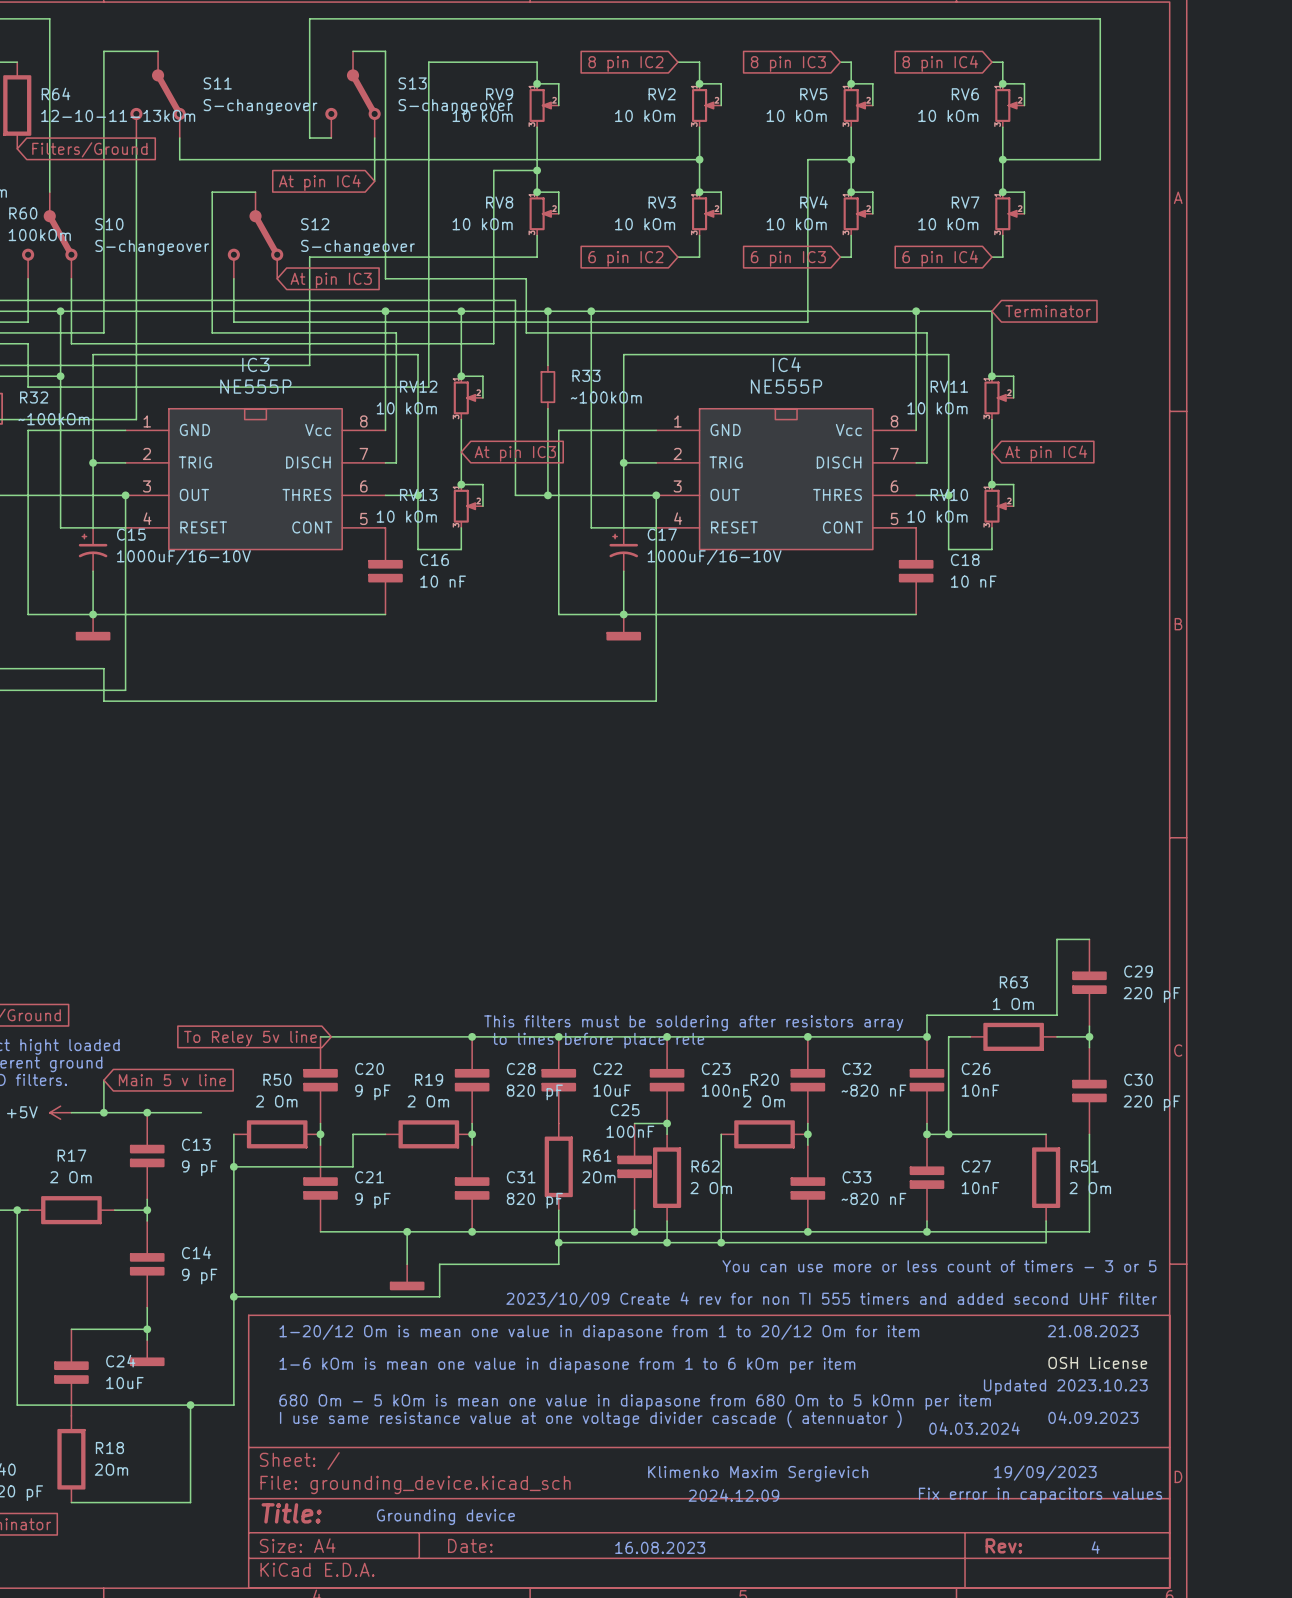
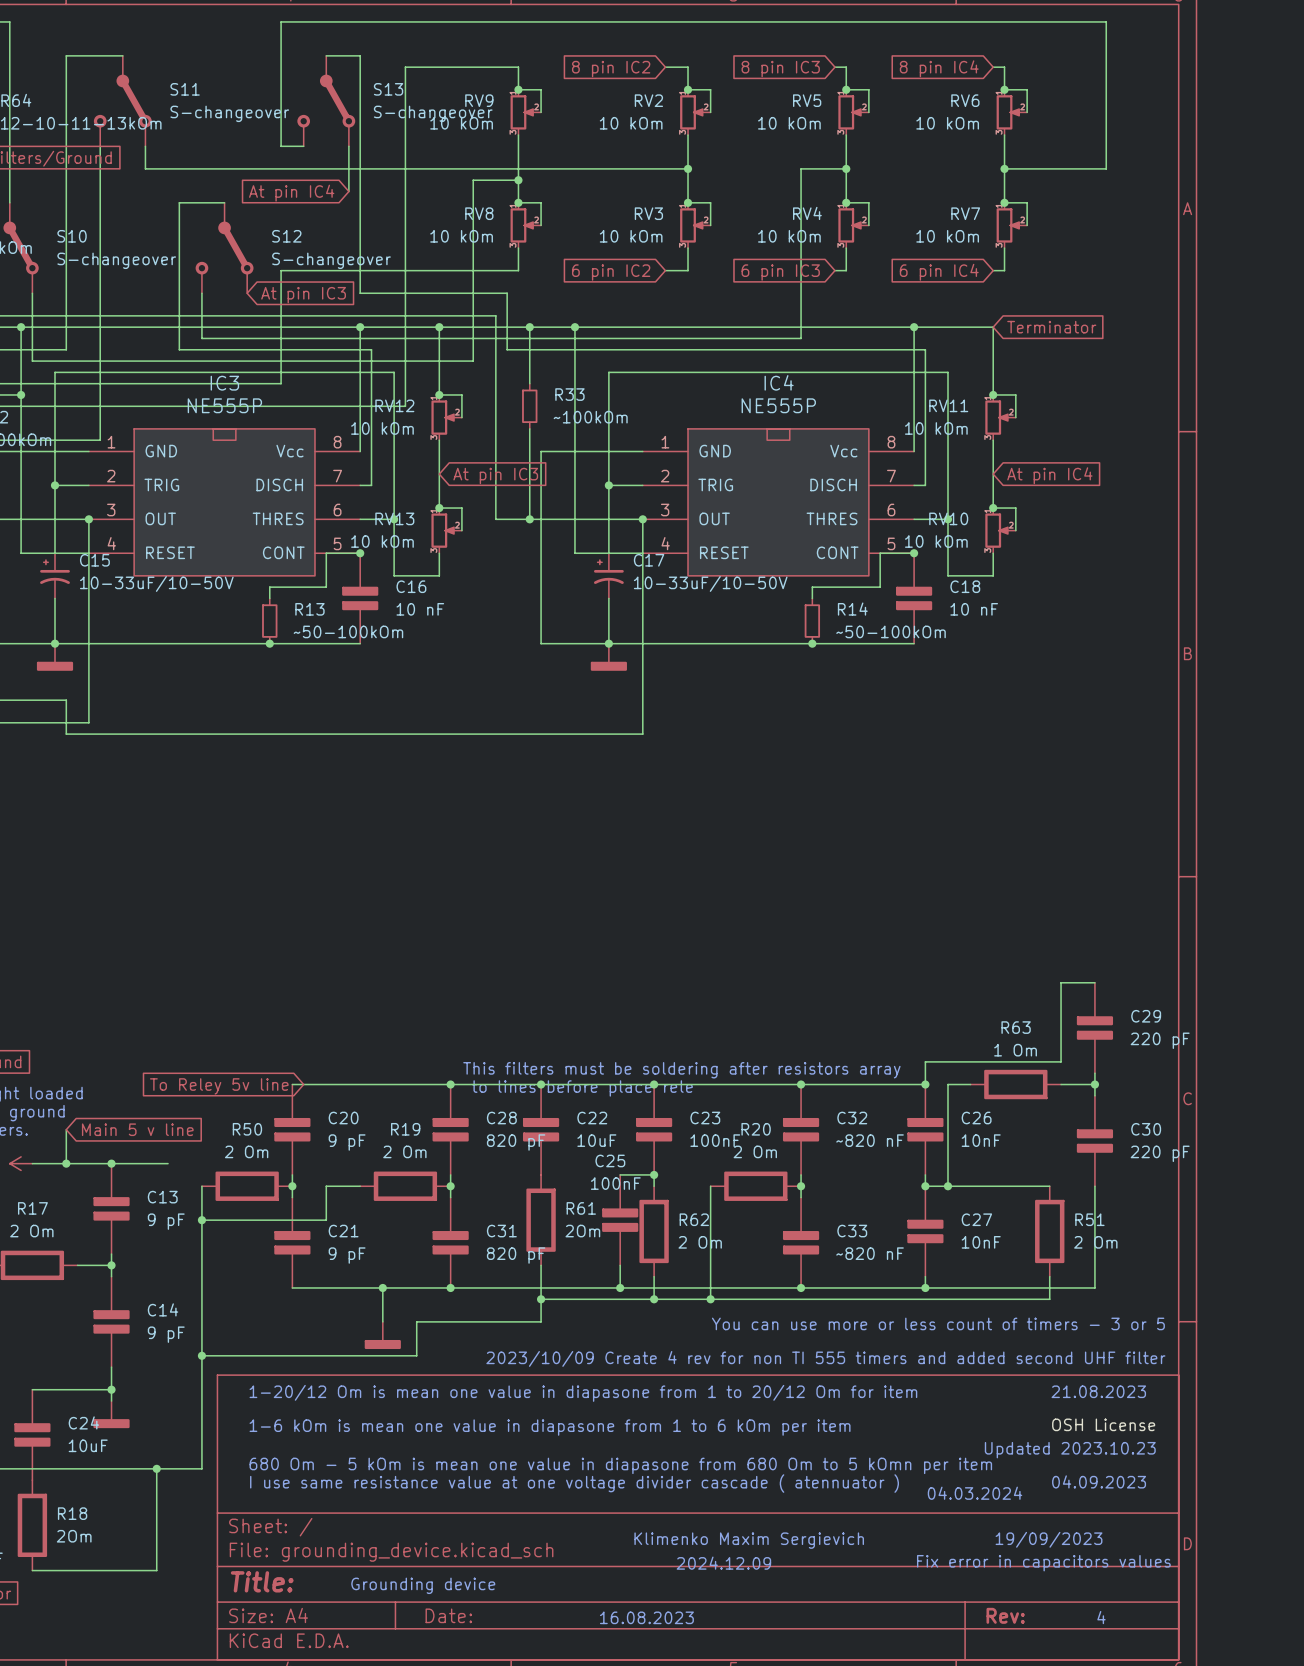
wire: none -> (360, 553) (326, 553) (326, 587) (269, 587) (269, 598)
junction: none -> (360, 553)
wire: none -> (914, 553) (880, 553) (880, 587) (812, 587) (812, 598)
junction: none -> (914, 553)
C15 text: 1000uF/16-10V (183, 557) -> 10-33uF/10-50V (156, 583)
C17 text: 1000uF/16-10V (714, 557) -> 10-33uF/10-50V (710, 583)
R13: none -> ~50-100kOm (269, 621)
R14: none -> ~50-100kOm (812, 621)
junction: none -> (269, 643)
junction: none -> (812, 643)

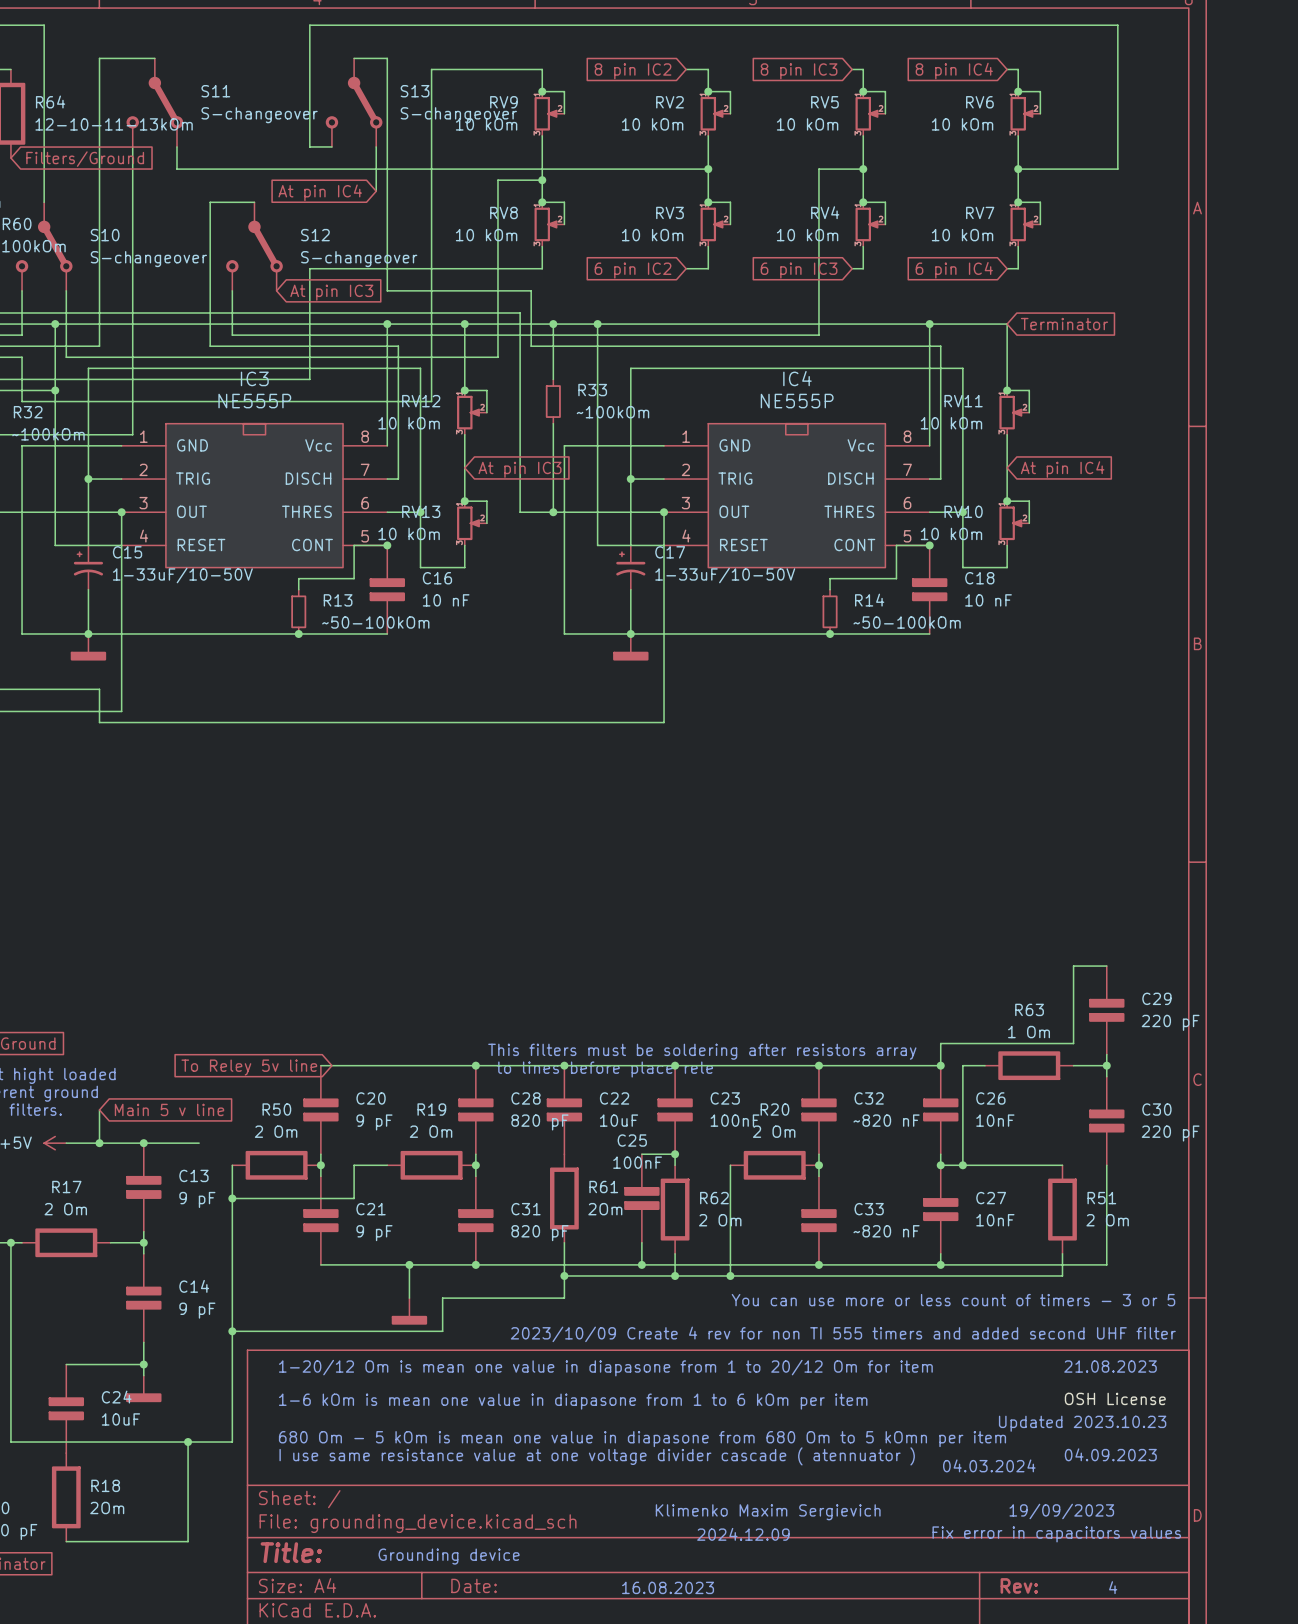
C15 text: 10-33uF/10-50V (156, 583) -> 1-33uF/10-50V (182, 575)
C17 text: 10-33uF/10-50V (710, 583) -> 1-33uF/10-50V (725, 575)

